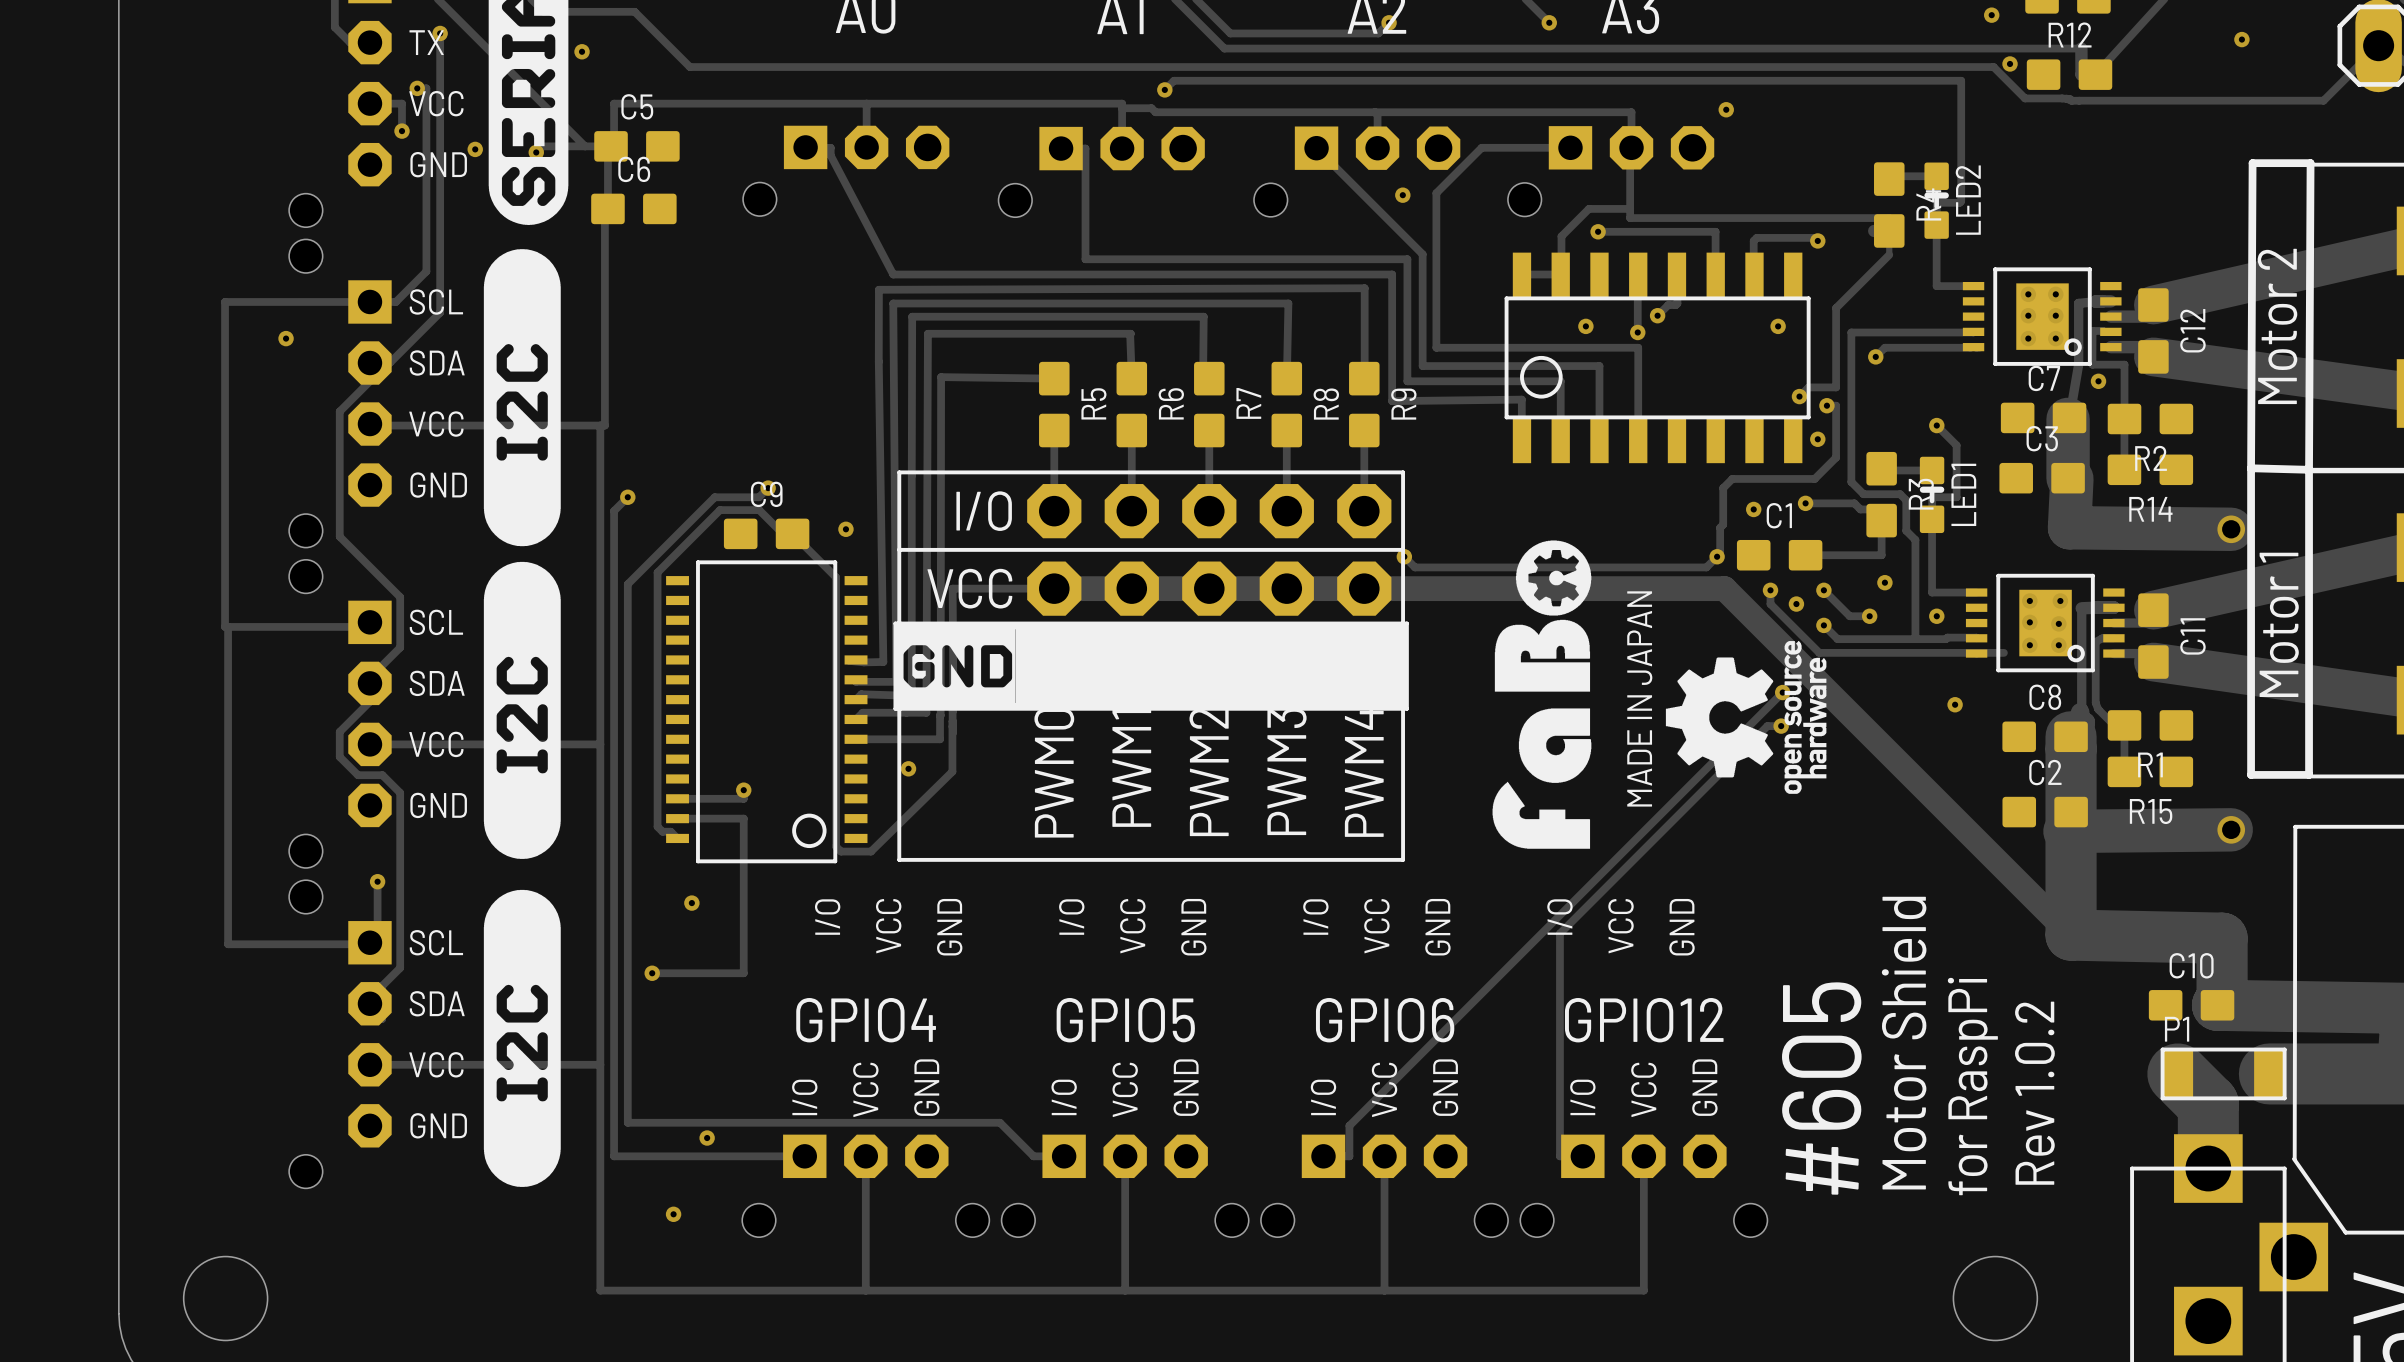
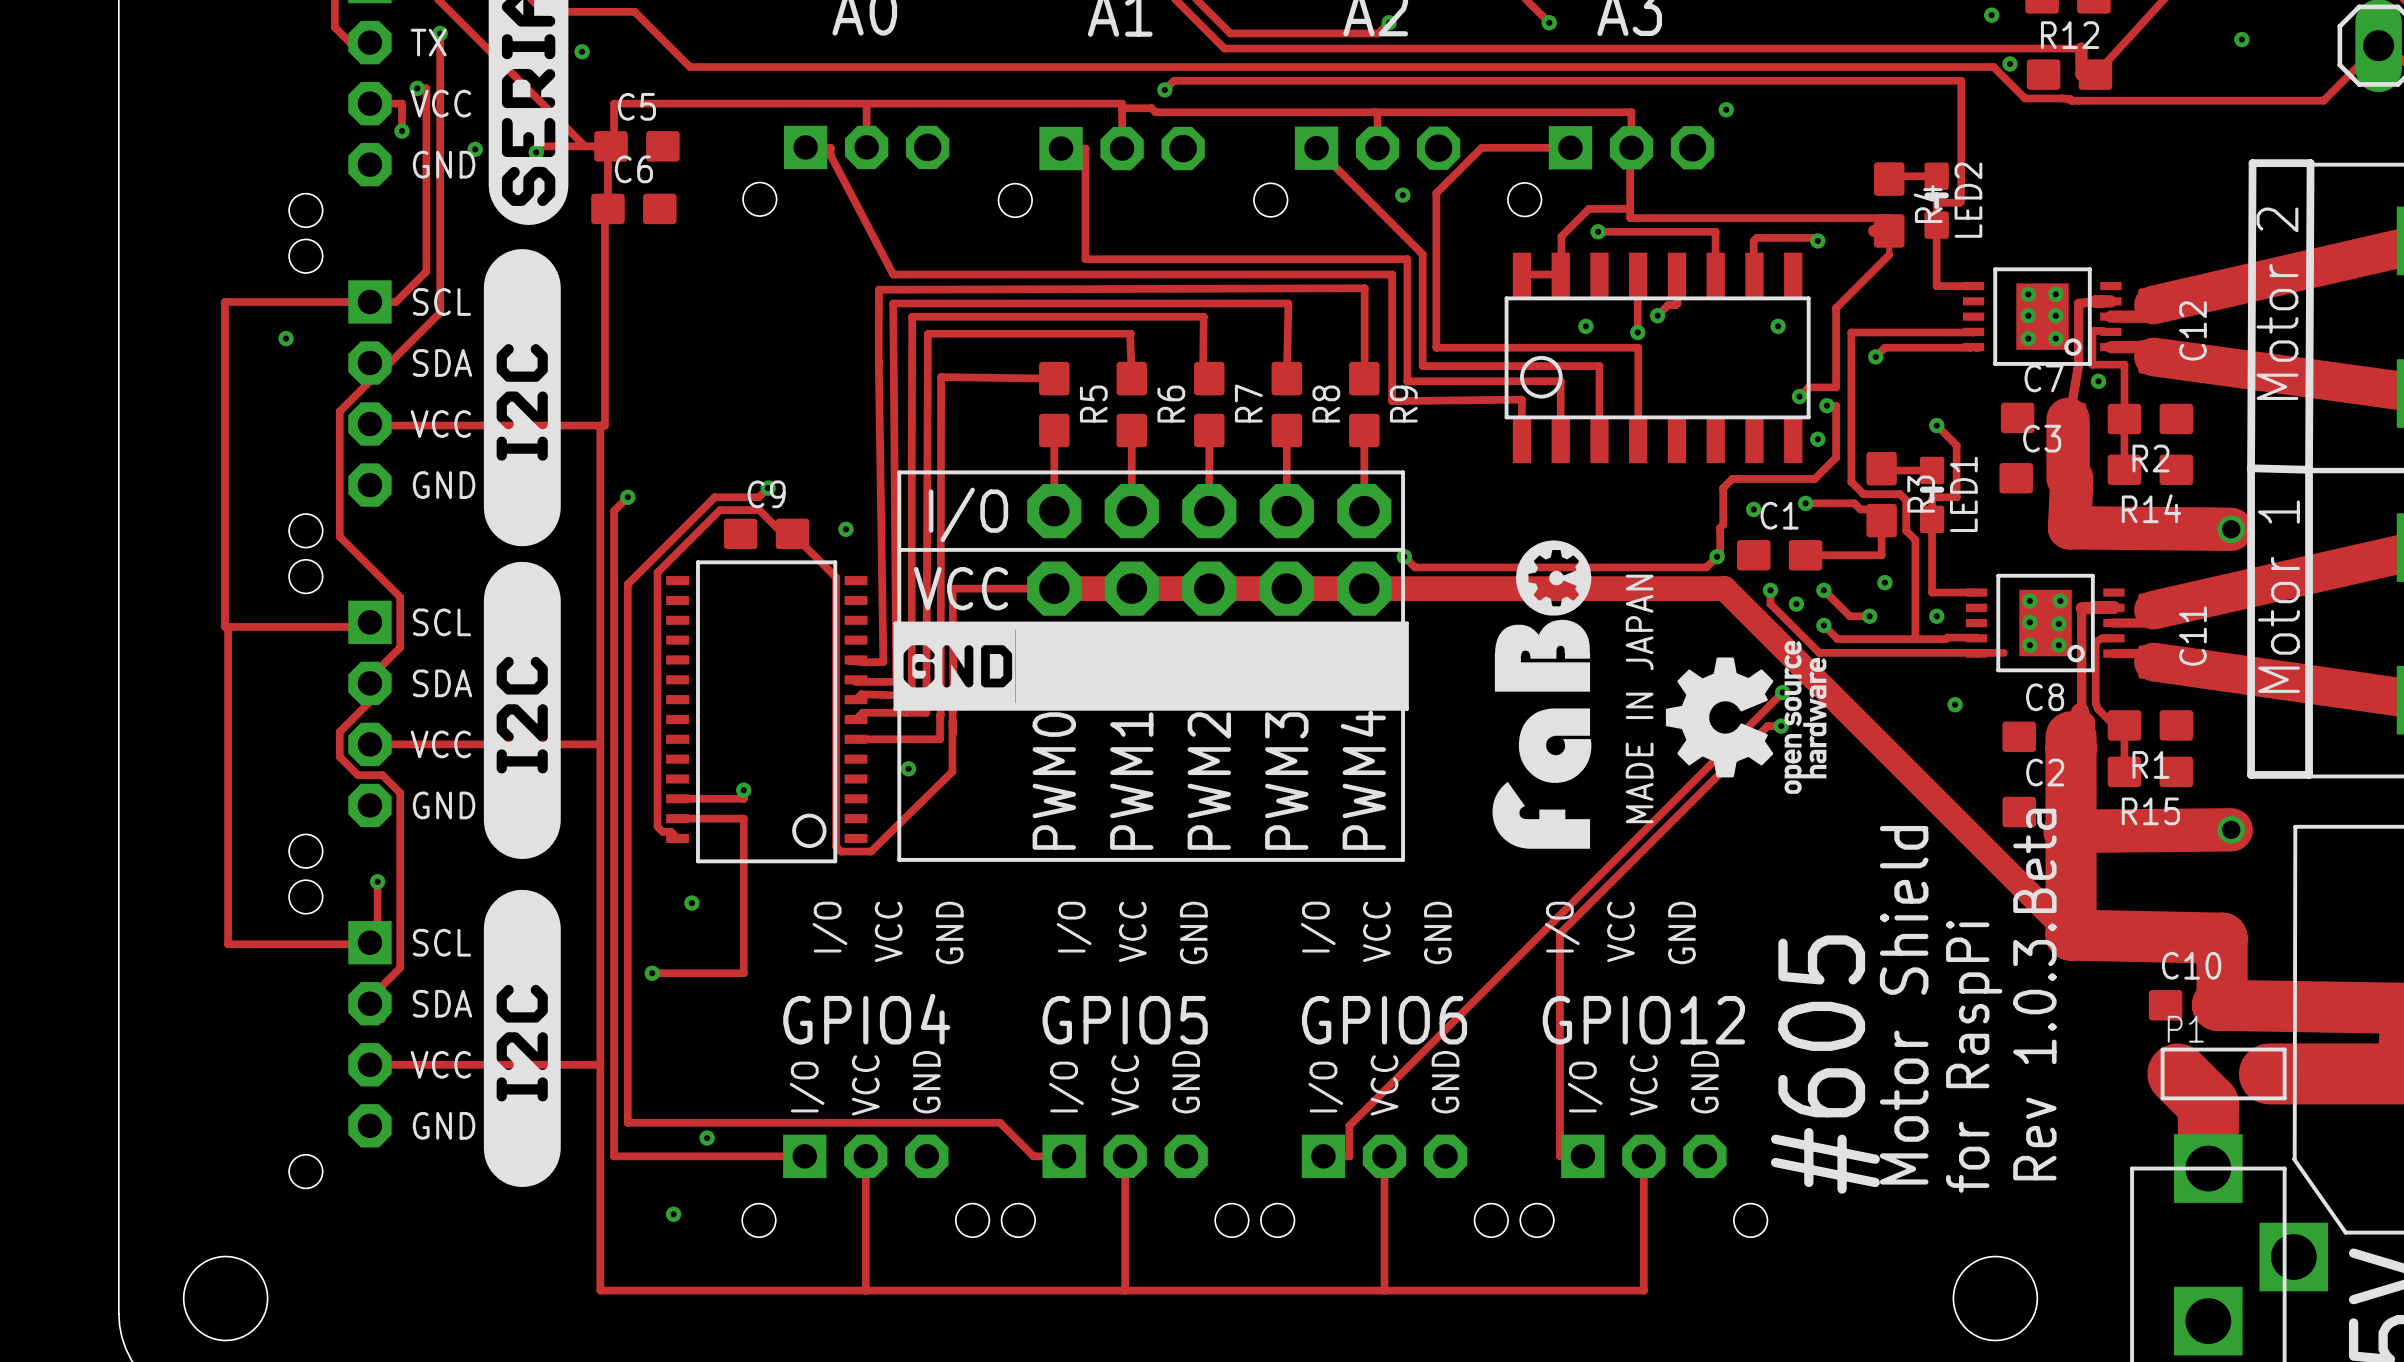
text: Rev 1.0.2 (2034, 1093) -> Rev 1.0.3.Beta (2034, 994)

